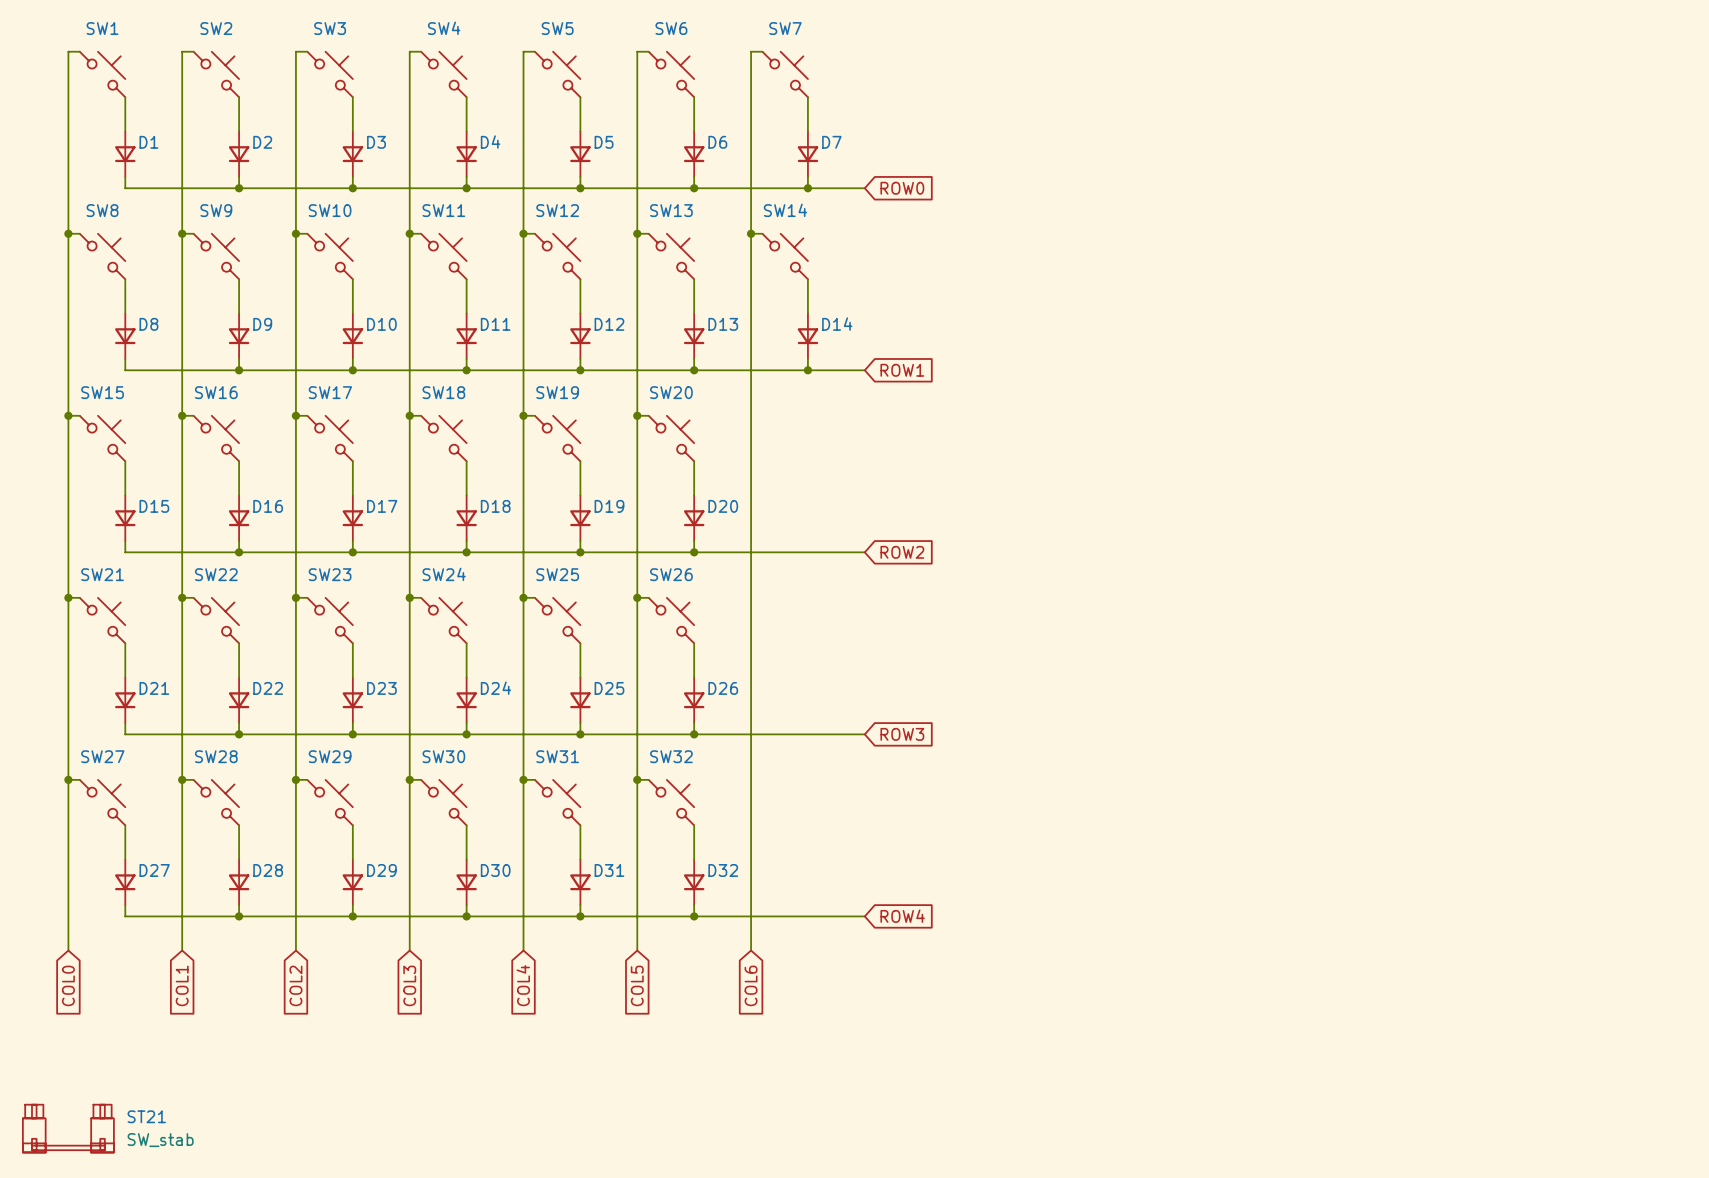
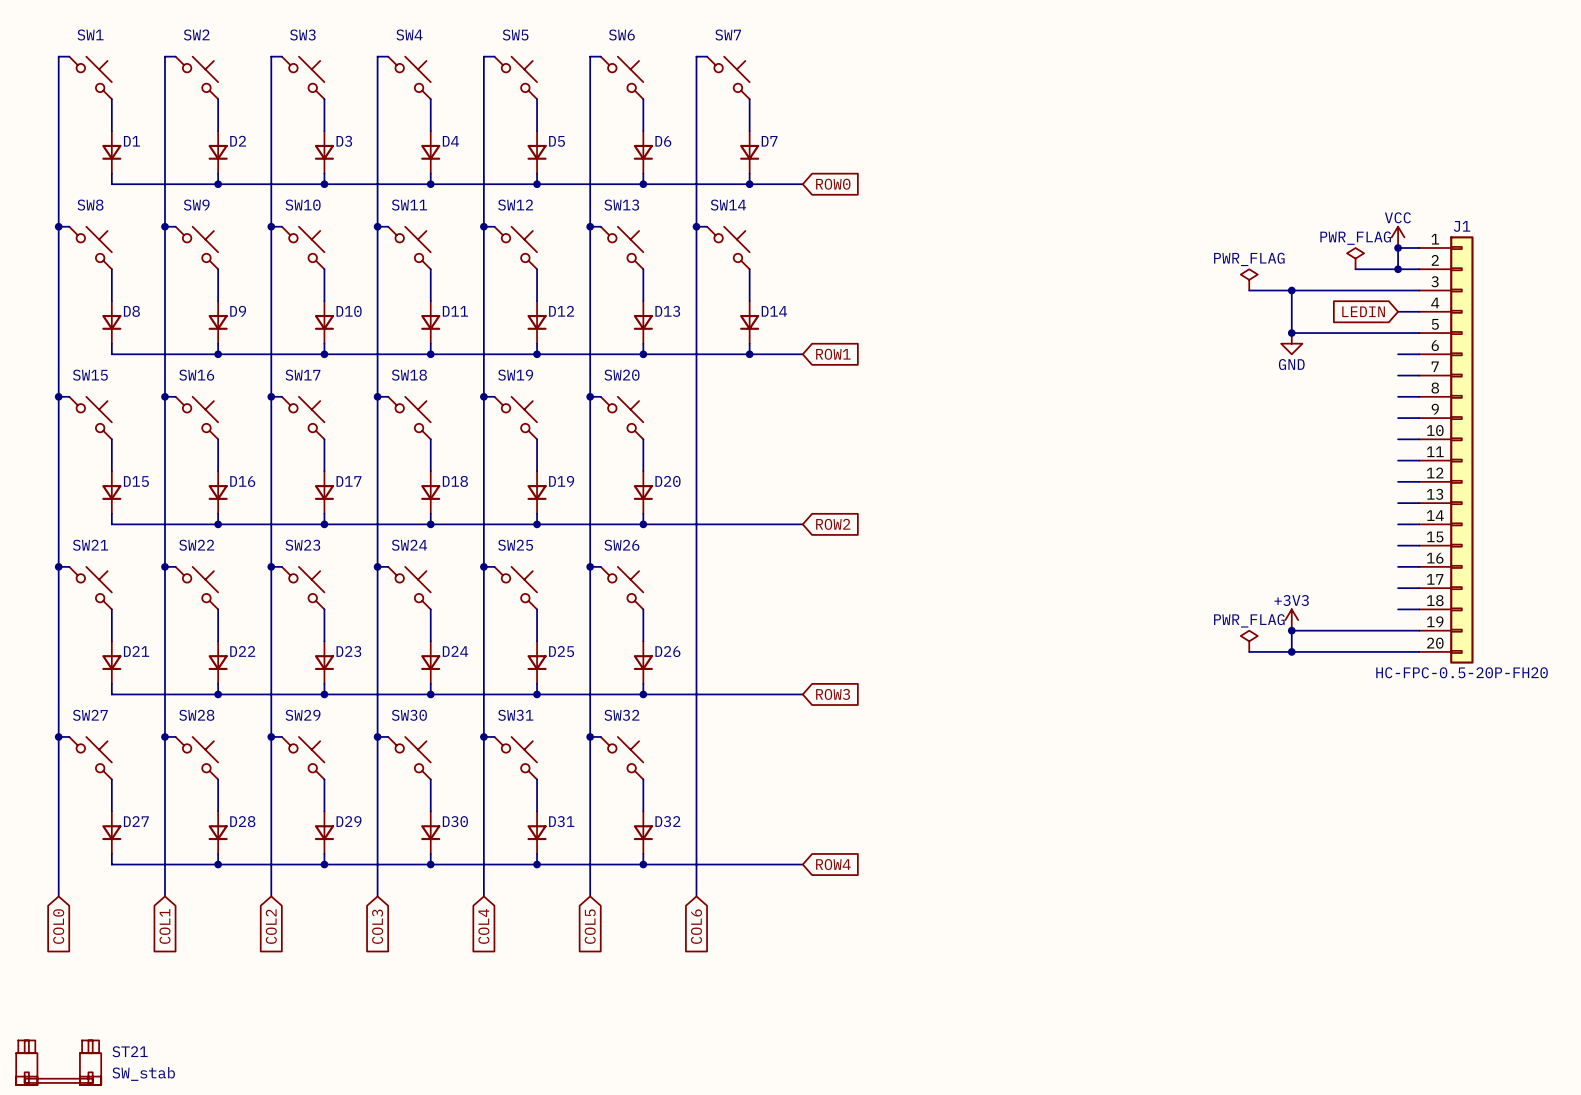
power symbol: none -> VCC (1398, 237)
junction: none -> (1398, 247)
wire: none -> (1419, 247) (1398, 247) (1398, 269)
power symbol: none -> PWR_FLAG (1355, 258)
wire: none -> (1355, 269) (1419, 269)
junction: none -> (1398, 269)
power symbol: none -> PWR_FLAG (1249, 279)
wire: none -> (1249, 290) (1419, 290)
wire: none -> (1291, 290) (1291, 333) (1419, 333)
junction: none -> (1291, 290)
global label: none -> LEDIN (1363, 311)
wire: none -> (1398, 311) (1419, 311)
junction: none -> (1291, 333)
power symbol: none -> GND (1291, 343)
wire: none -> (1398, 354) (1419, 354)
wire: none -> (1398, 375) (1419, 375)
wire: none -> (1398, 396) (1419, 396)
wire: none -> (1398, 418) (1419, 418)
wire: none -> (1398, 439) (1419, 439)
J1: none -> HC-FPC-0.5-20P-FH20 (1446, 449)
wire: none -> (1398, 460) (1419, 460)
wire: none -> (1398, 481) (1419, 481)
wire: none -> (1398, 503) (1419, 503)
wire: none -> (1398, 524) (1419, 524)
wire: none -> (1398, 545) (1419, 545)
wire: none -> (1398, 566) (1419, 566)
wire: none -> (1398, 588) (1419, 588)
wire: none -> (1398, 609) (1419, 609)
power symbol: none -> +3V3 (1291, 620)
junction: none -> (1291, 630)
wire: none -> (1419, 630) (1291, 630) (1291, 651)
power symbol: none -> PWR_FLAG (1249, 641)
wire: none -> (1249, 651) (1419, 651)
junction: none -> (1291, 651)

